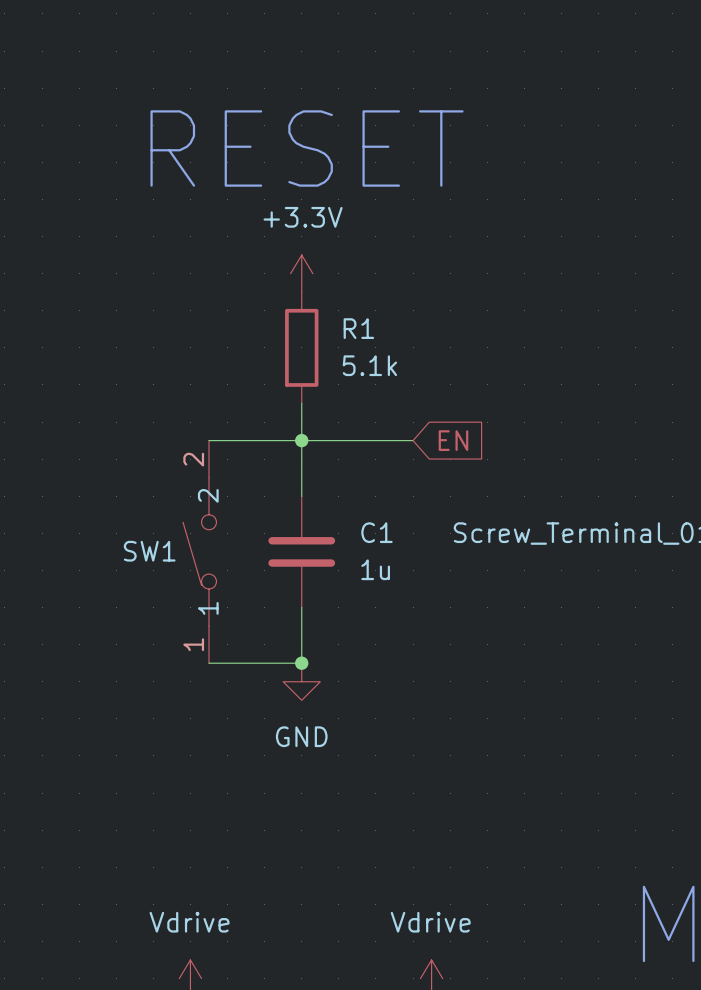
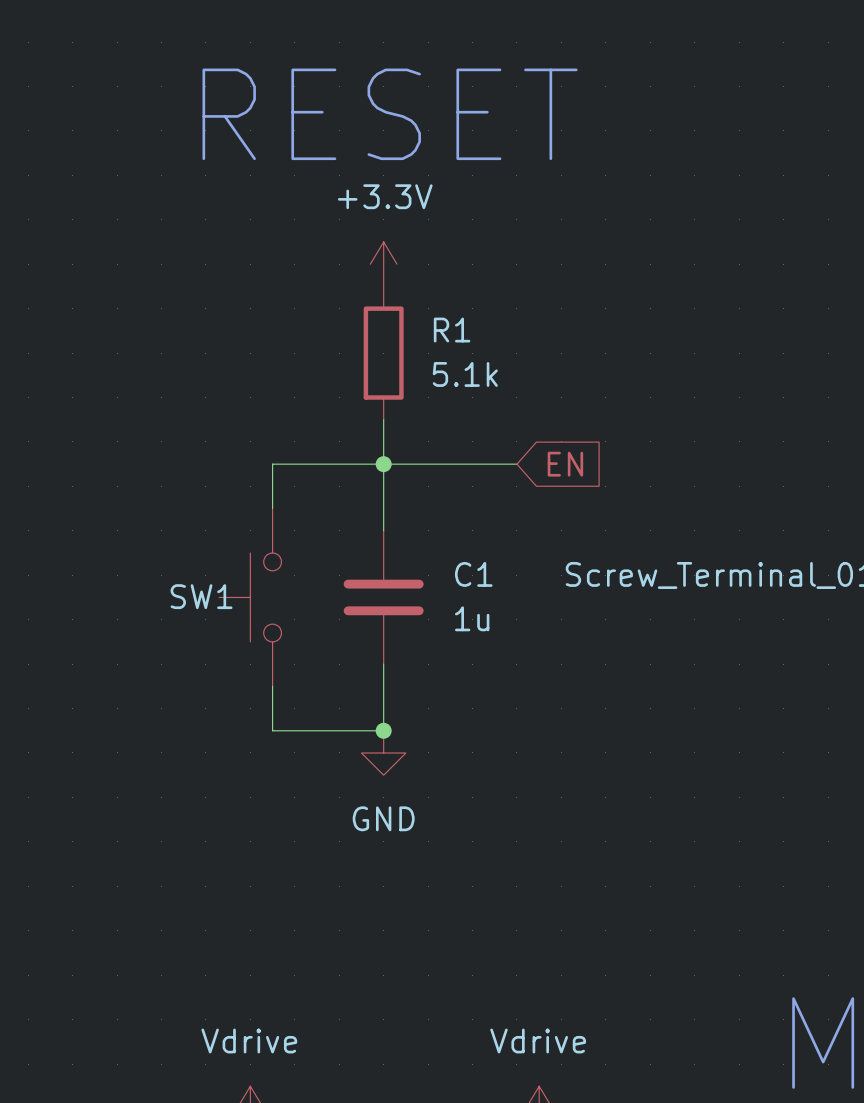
SW1 symbol: [182, 440, 217, 664] -> [219, 508, 282, 687]

